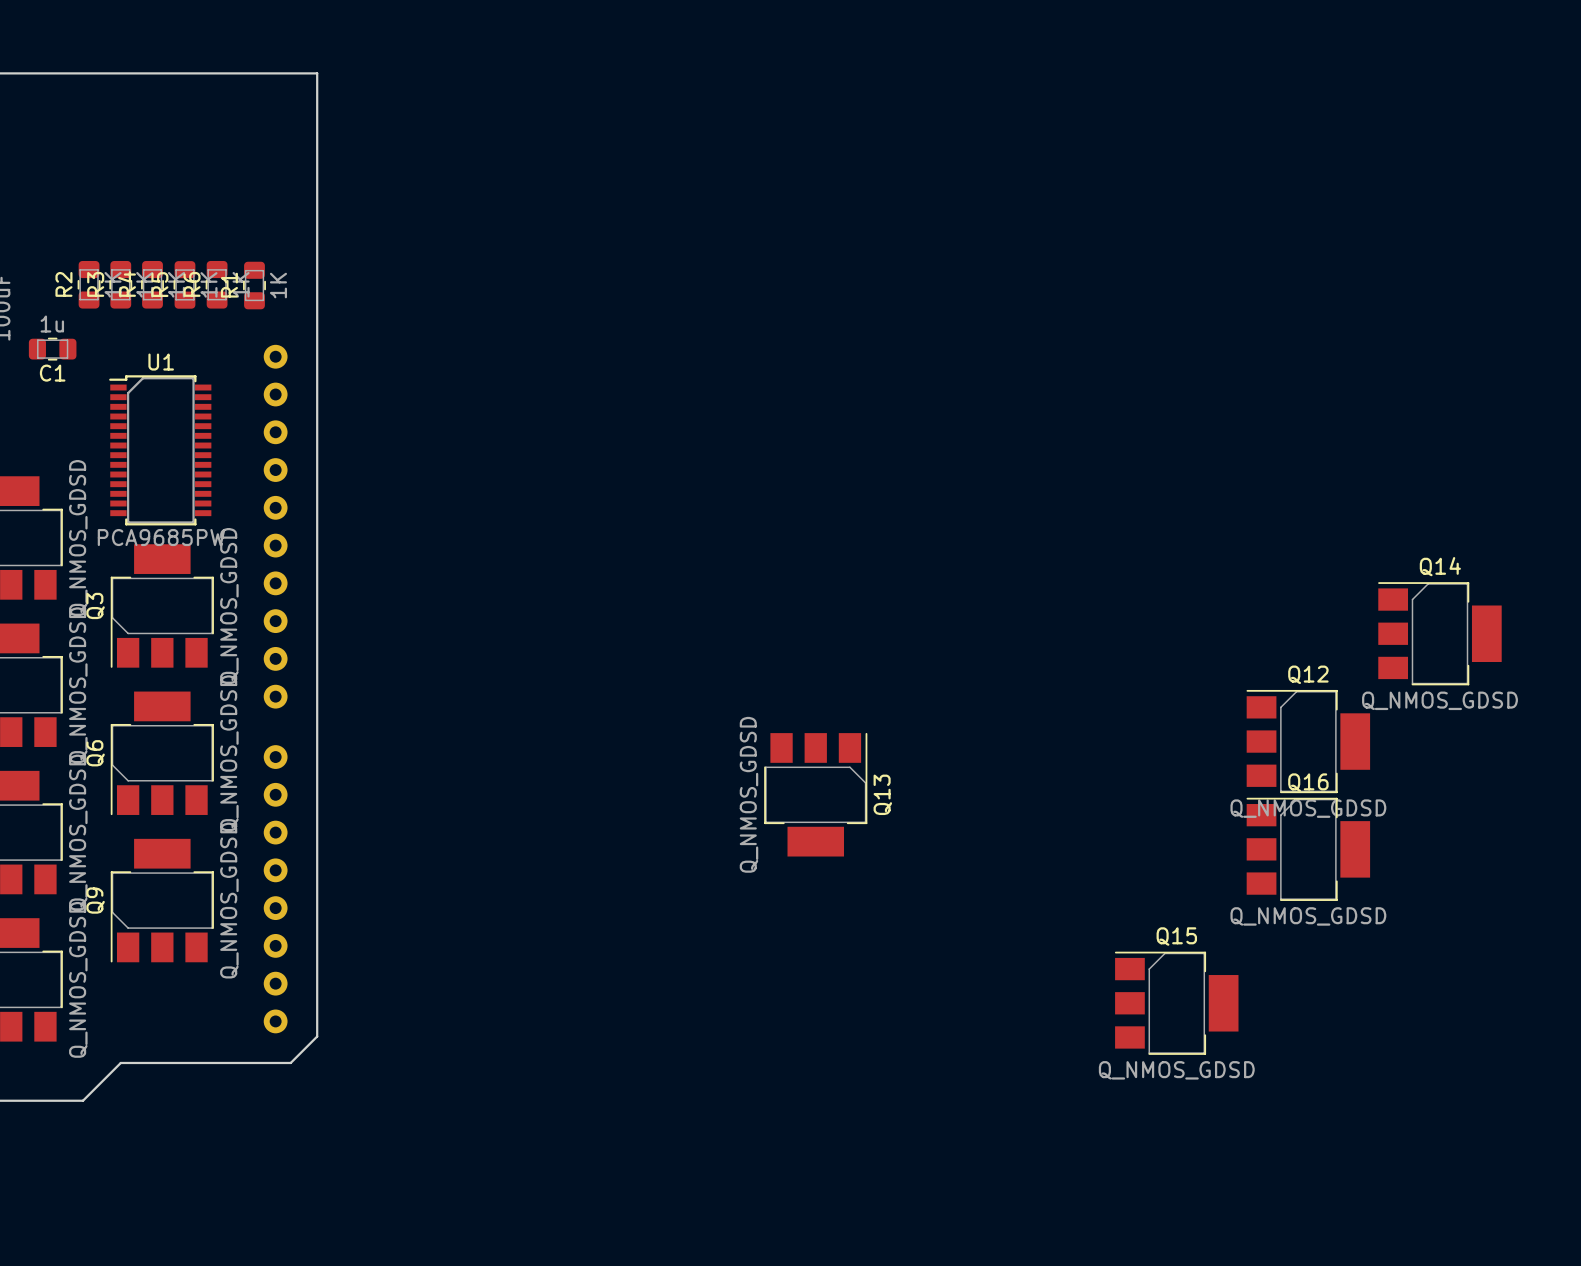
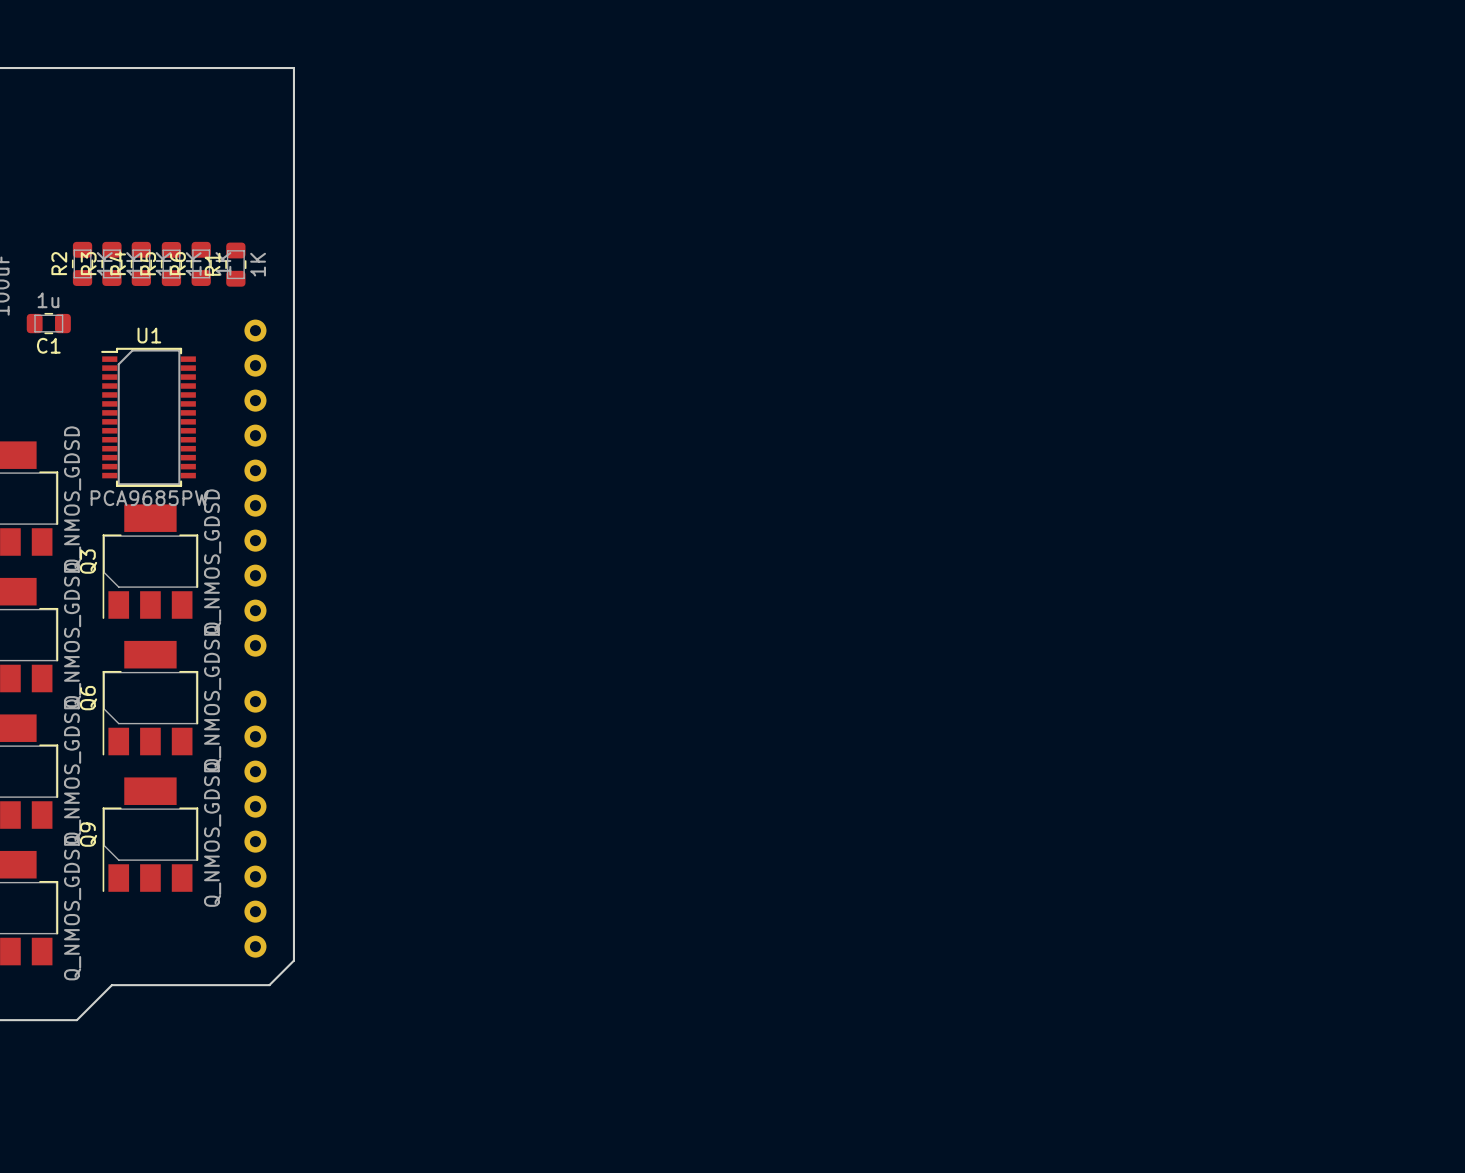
Q14: Q_NMOS_GDSD (1439, 633) -> none
Q12: Q_NMOS_GDSD (1308, 741) -> none
Q13: Q_NMOS_GDSD (815, 794) -> none
Q16: Q_NMOS_GDSD (1308, 849) -> none
Q15: Q_NMOS_GDSD (1176, 1003) -> none

